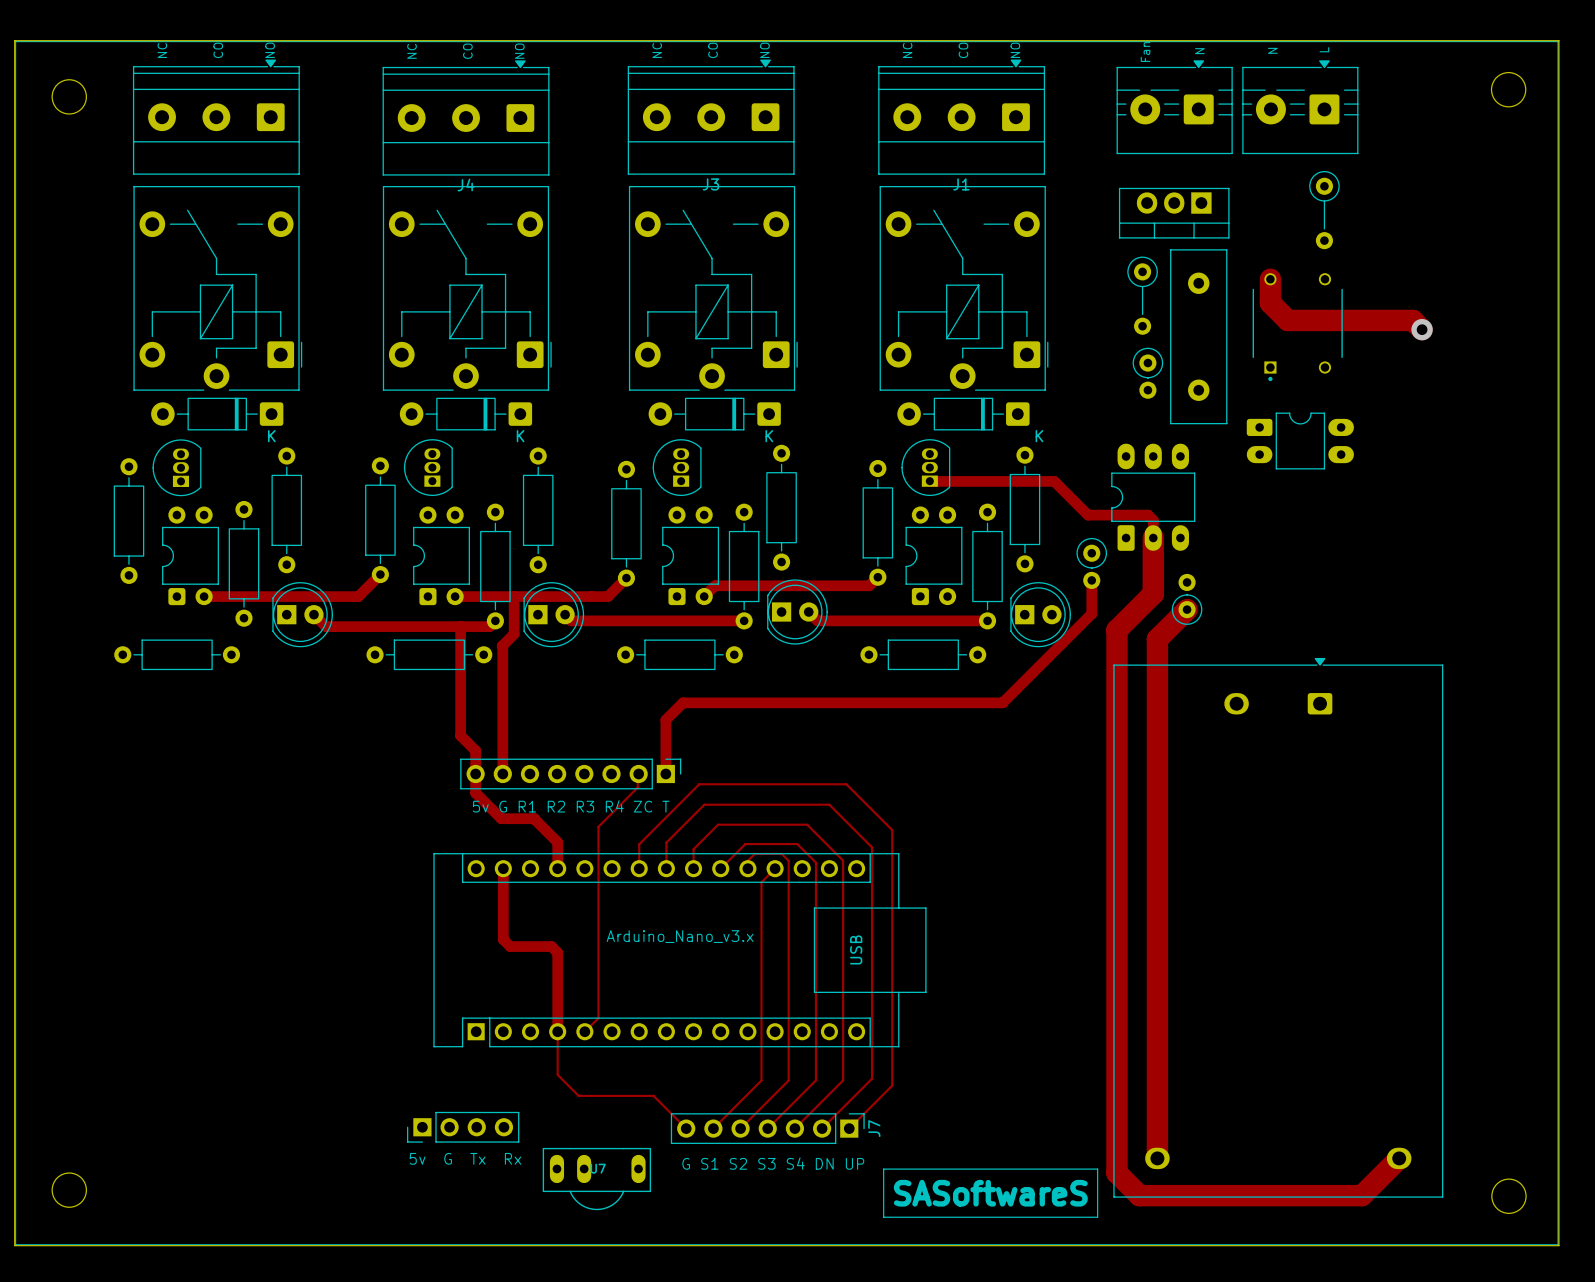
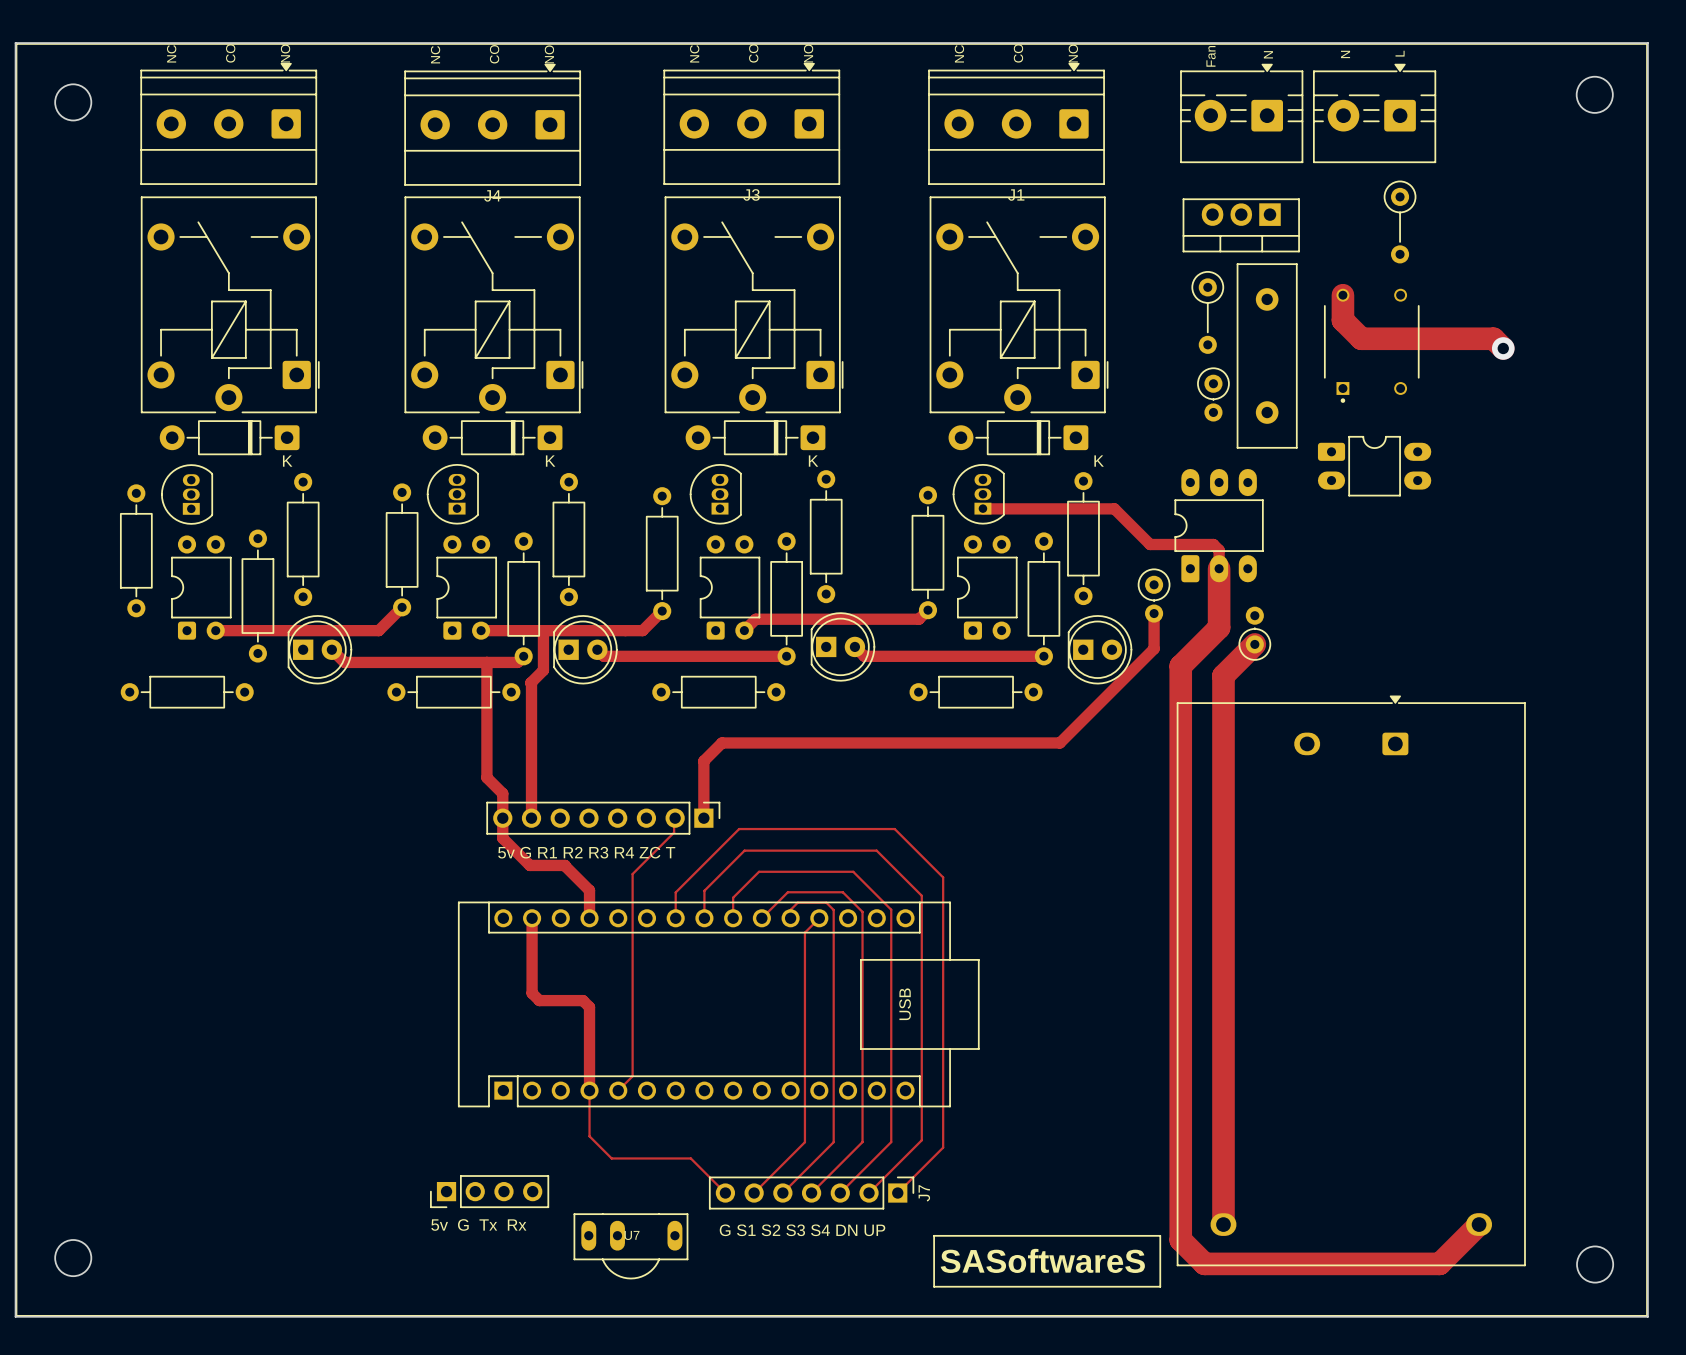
text: Arduino_Nano_v3.x (680, 936) -> none

